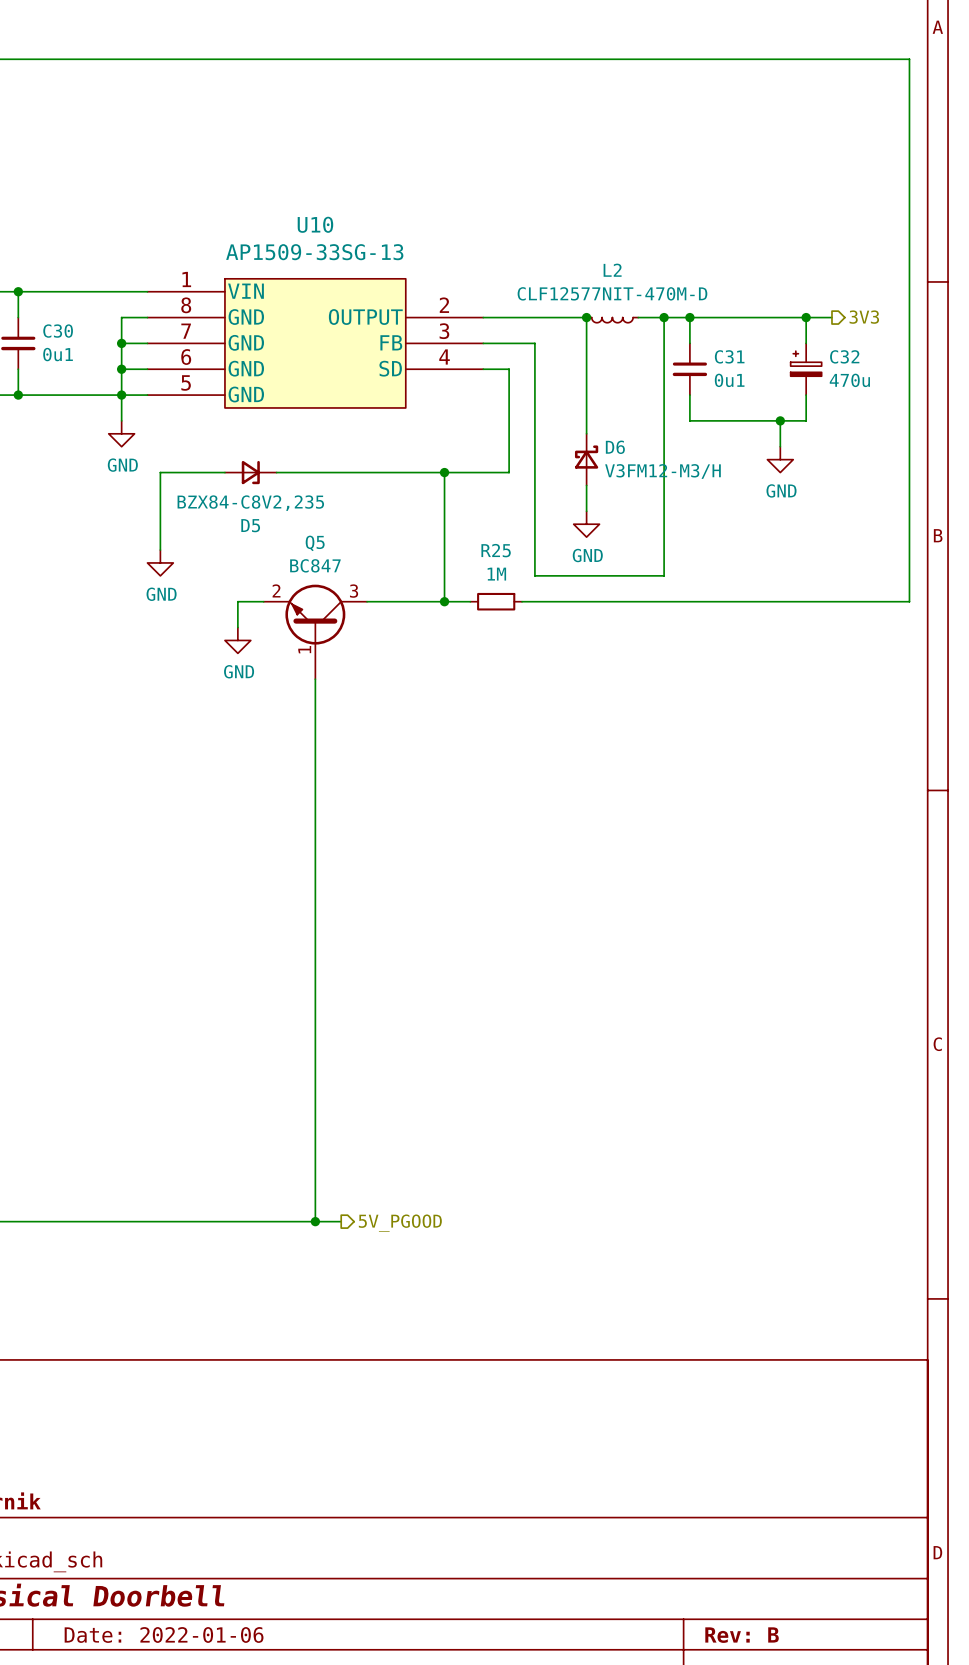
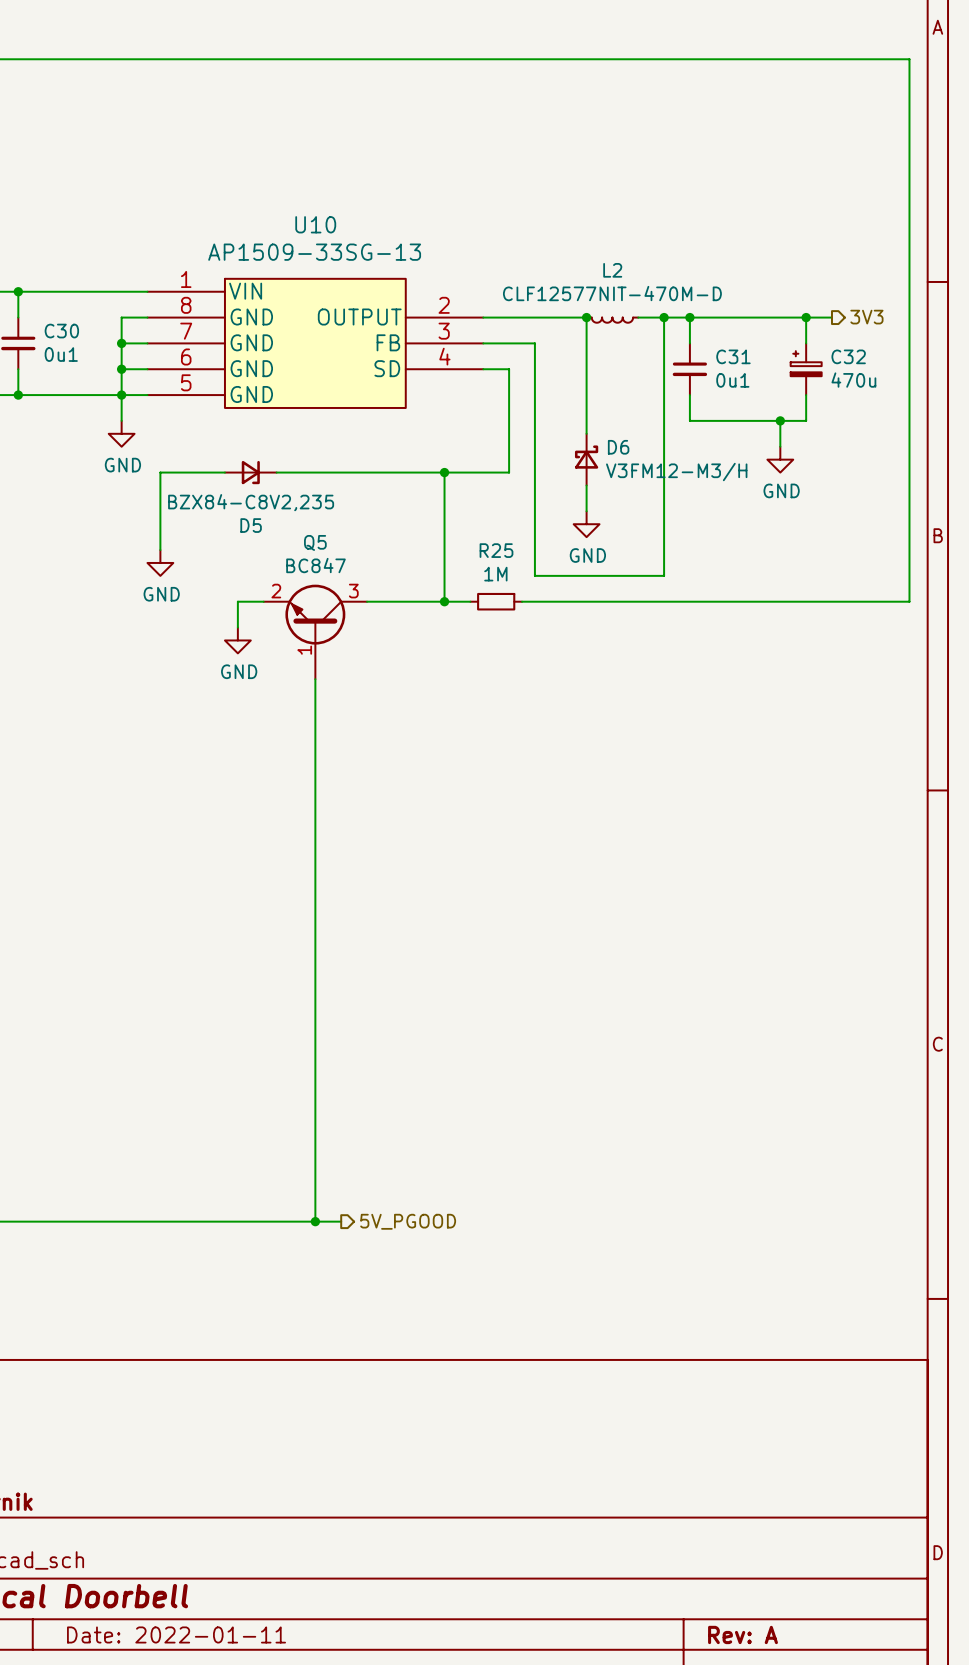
title block: Date: 2022-01-06 (164, 1634) -> Date: 2022-01-11 (176, 1634)
title block: Rev: B (742, 1635) -> Rev: A (743, 1634)

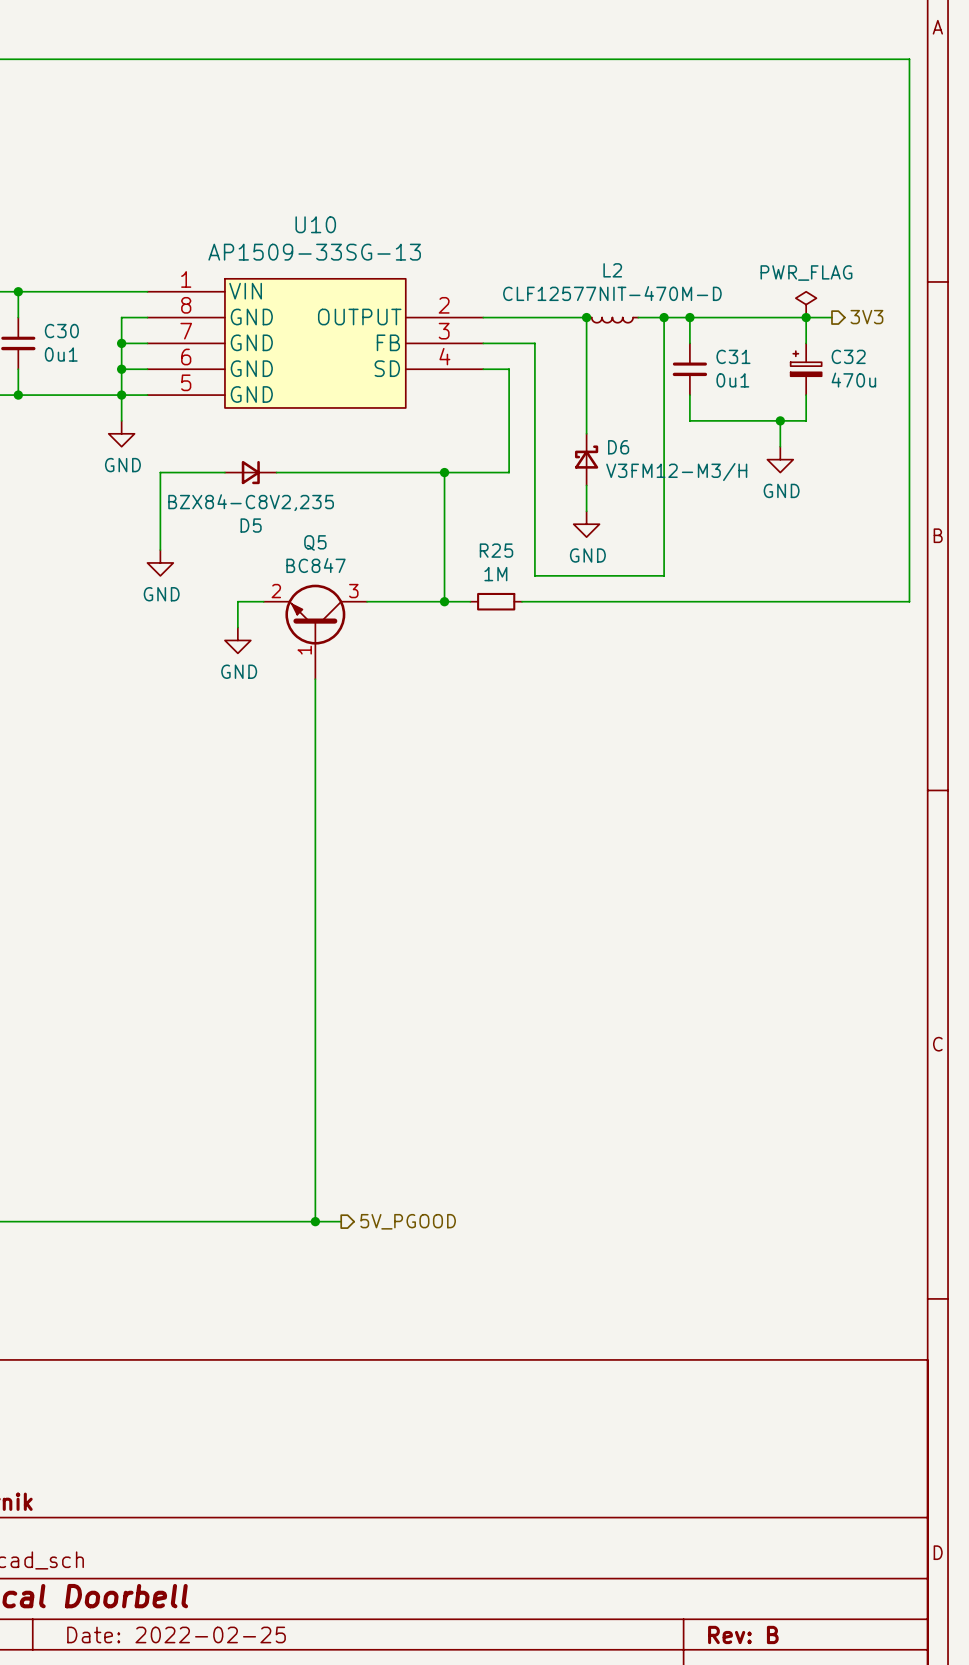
power symbol: none -> PWR_FLAG (806, 304)
title block: Date: 2022-01-11 (176, 1634) -> Date: 2022-02-25 (176, 1634)
title block: Rev: A (743, 1634) -> Rev: B (743, 1634)

